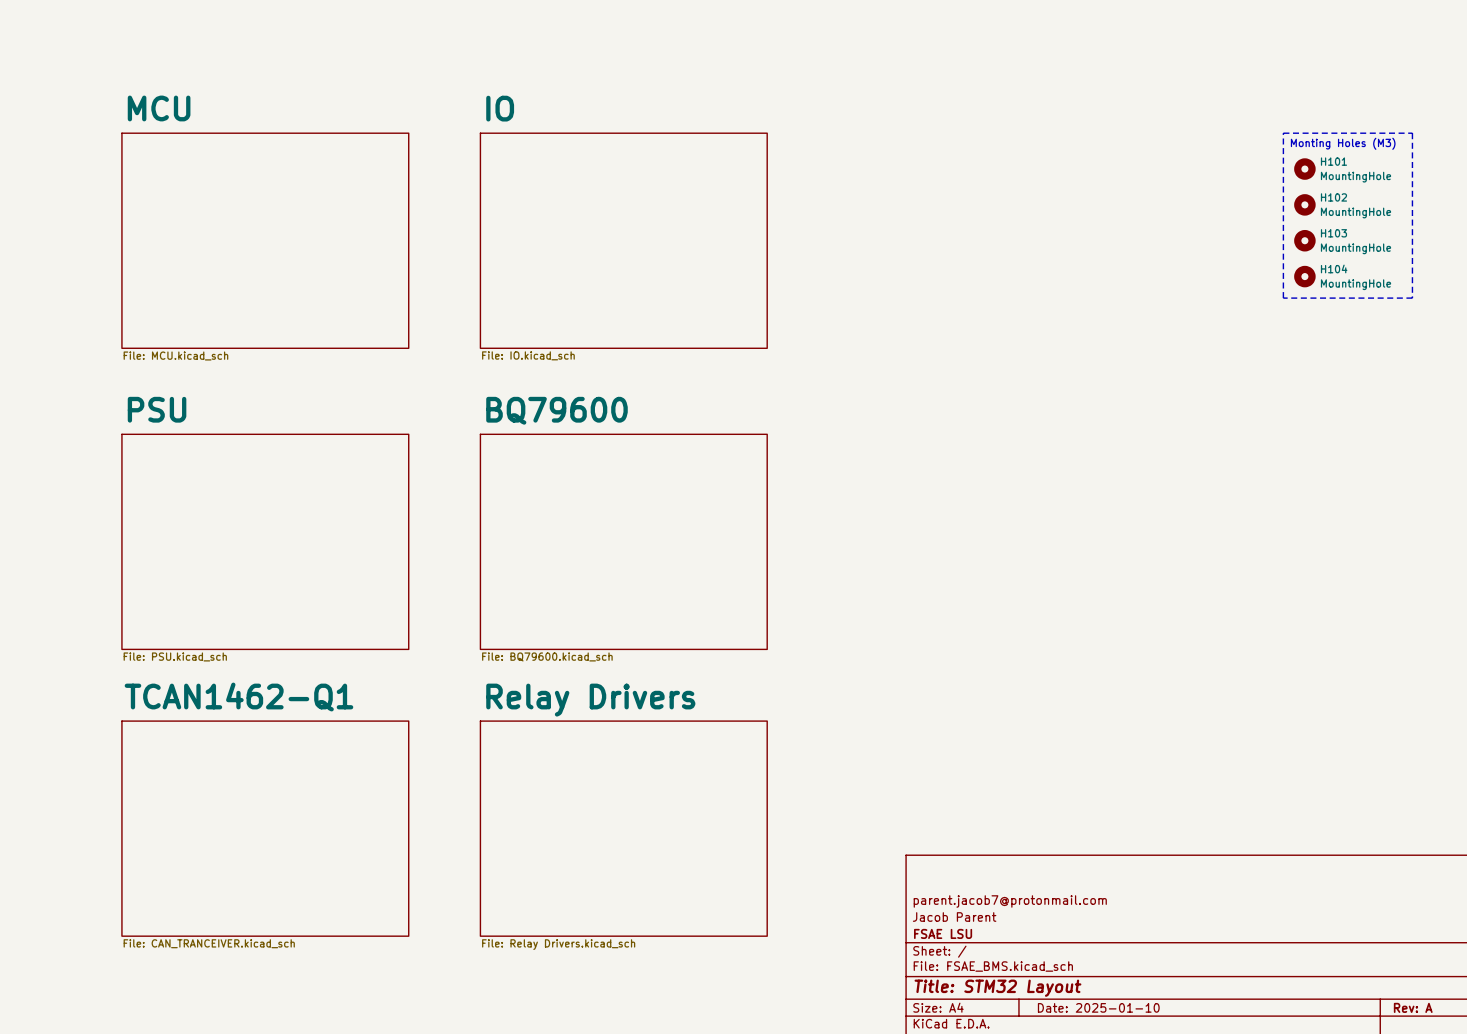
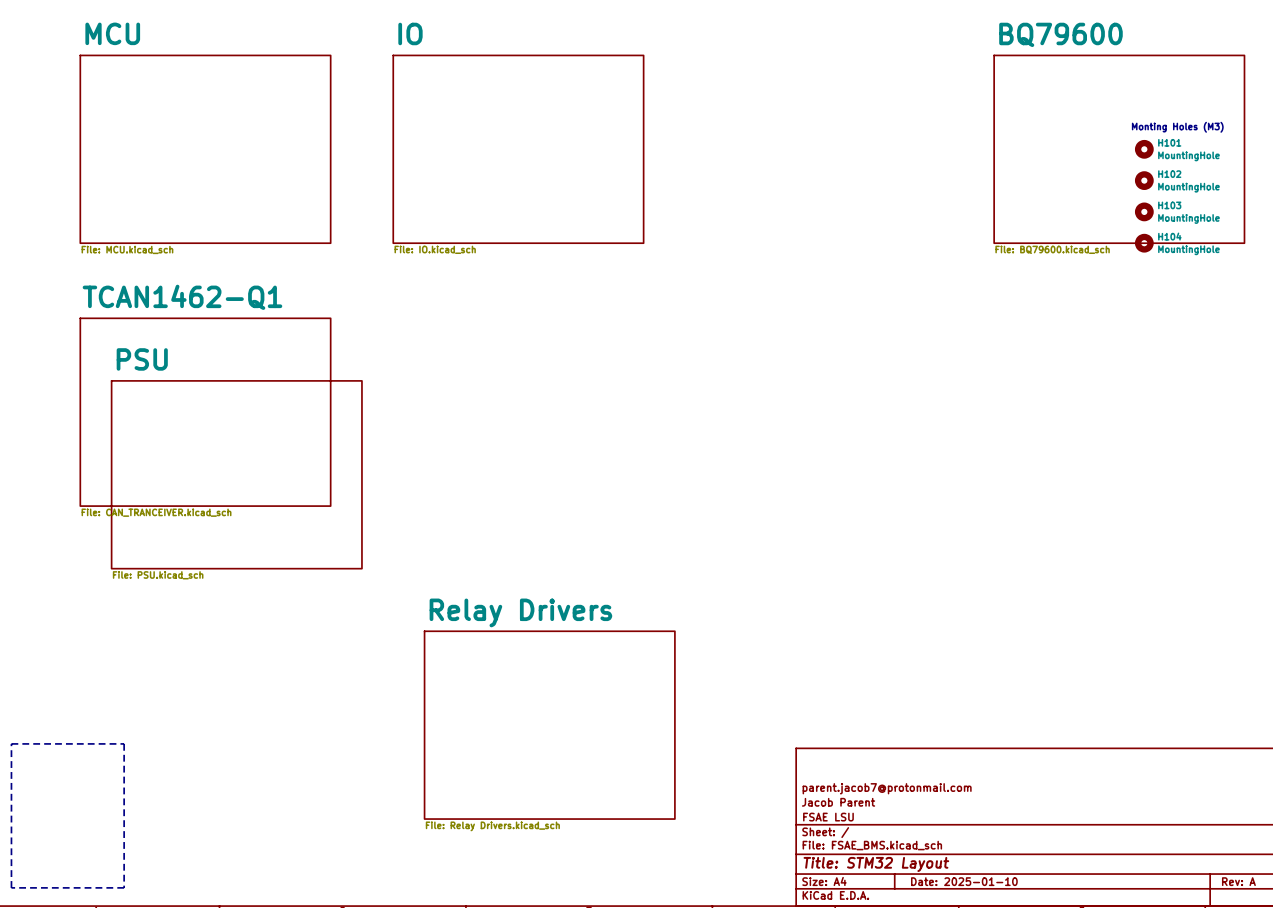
line: (1283, 133) (1412, 133) (1412, 298) (1283, 298) (1283, 133) -> none
sheet MCU position: (265, 240) -> (205, 149)
sheet IO position: (623, 240) -> (518, 149)
sheet BQ79600 position: (623, 541) -> (1119, 149)
sheet TCAN1462-Q1 position: (265, 828) -> (205, 412)
line: none -> (11, 743) (124, 743) (124, 887) (11, 887) (11, 743)

